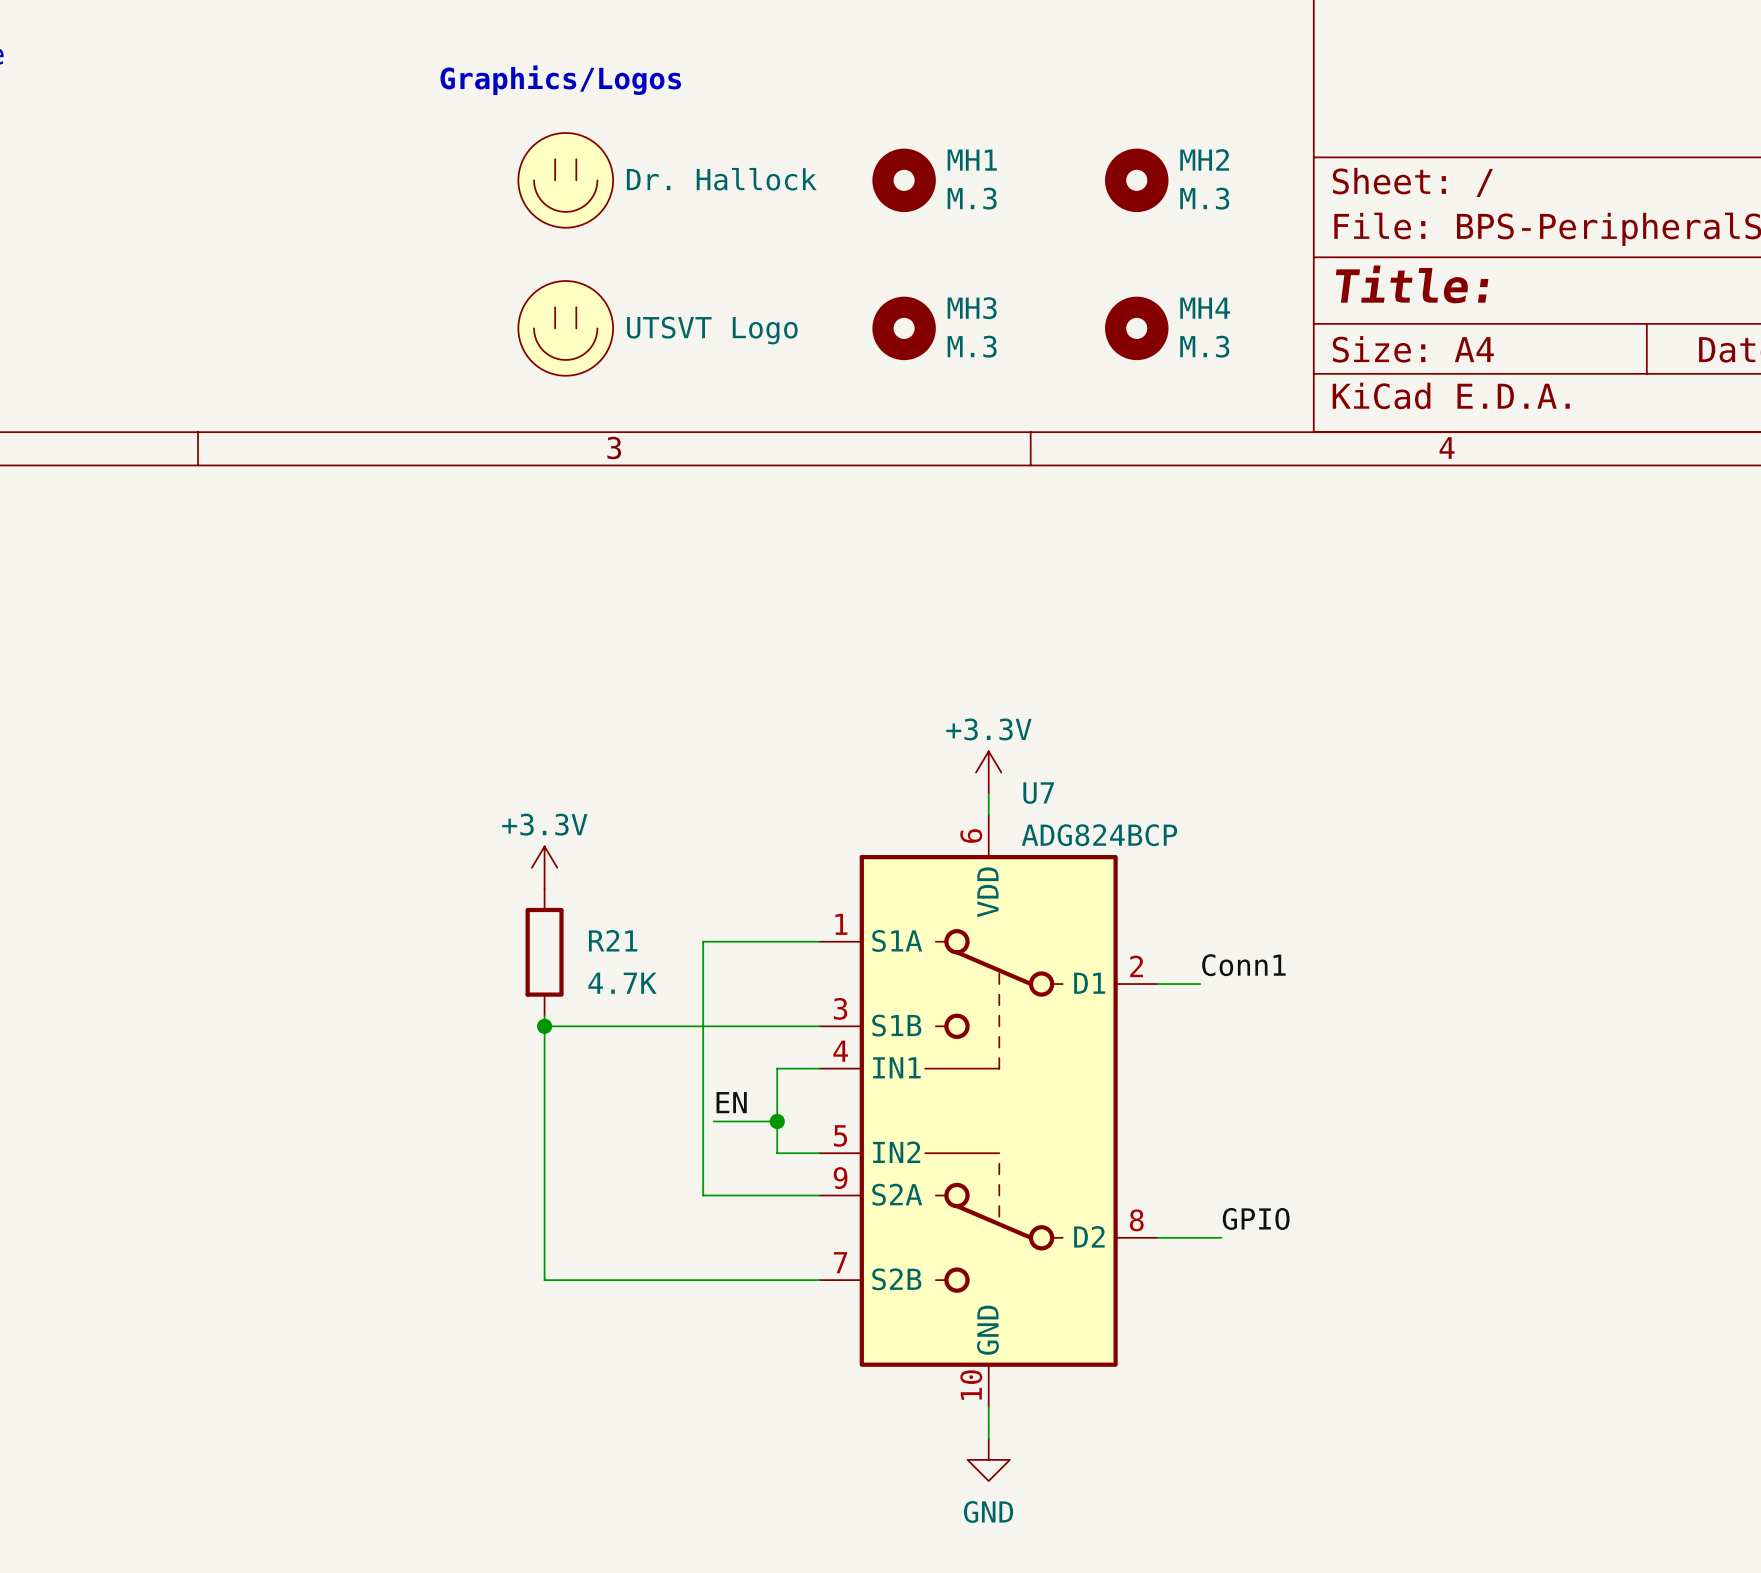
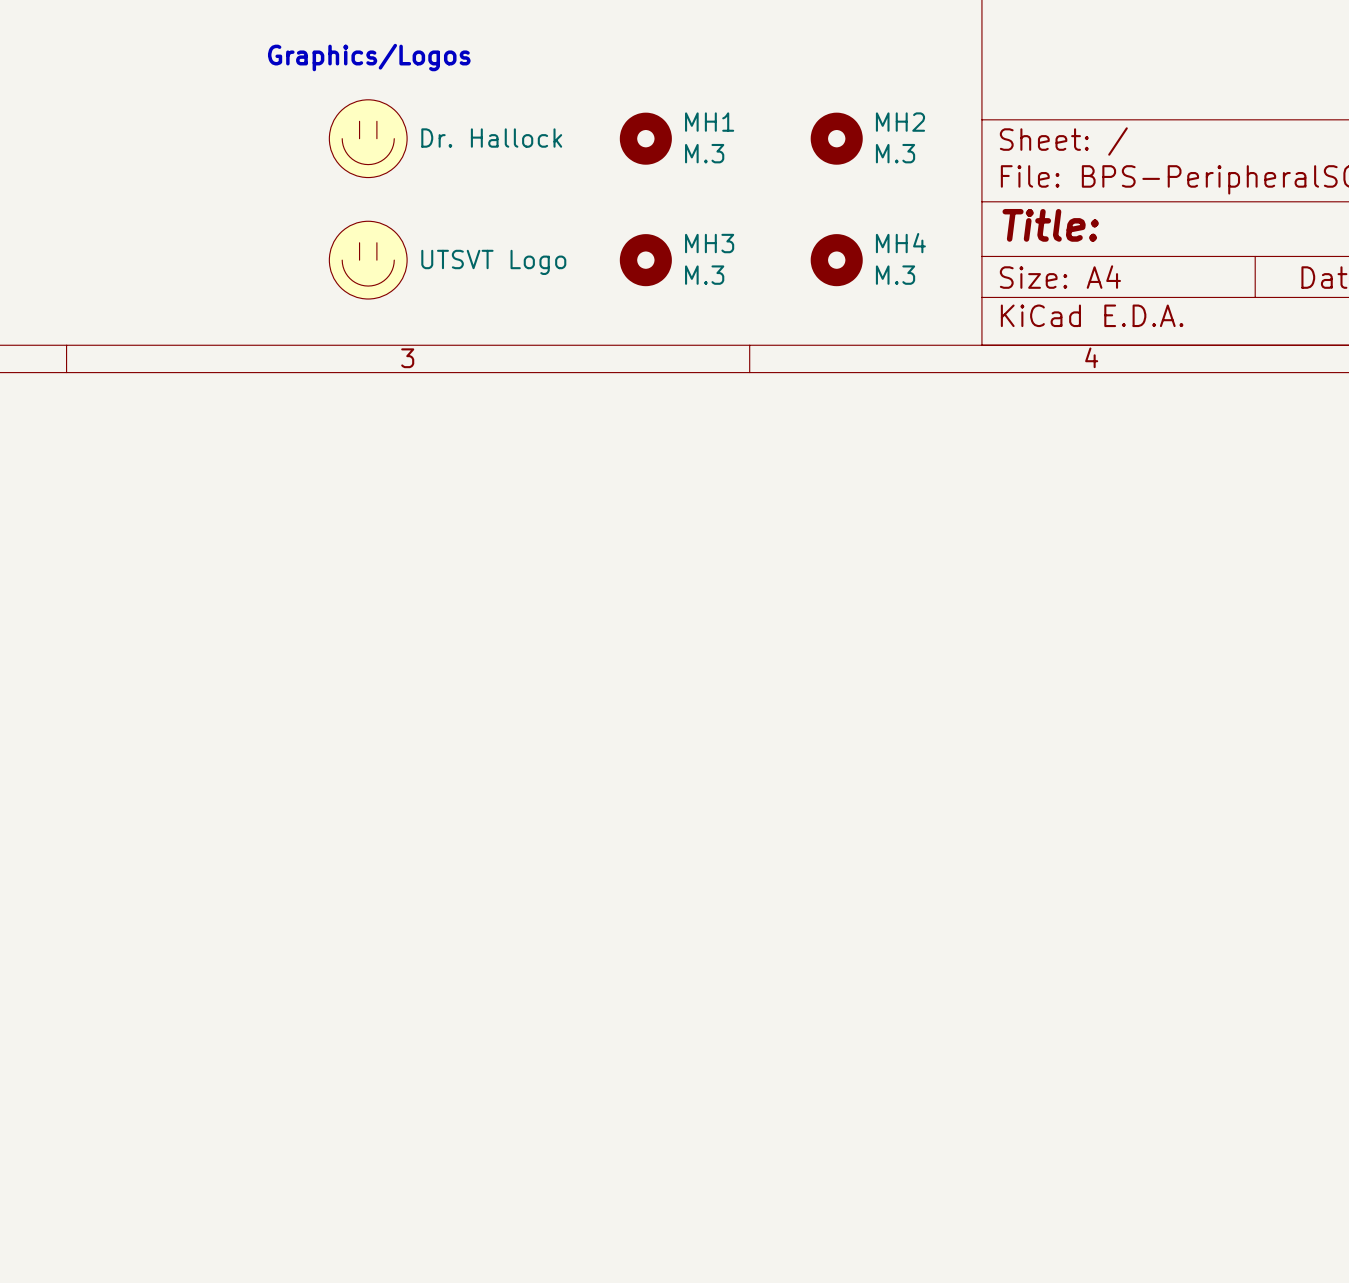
power symbol: +3.3V (988, 772) -> none
wire: (988, 793) (988, 814) -> none
power symbol: +3.3V (544, 867) -> none
wire: (819, 941) (703, 941) (703, 1195) (819, 1195) -> none
R21: 4.7K (544, 952) -> none
label: Conn1 (1243, 965) -> none
wire: (1157, 984) (1200, 984) -> none
wire: (544, 1015) (544, 1280) (819, 1280) -> none
wire: (544, 1026) (819, 1026) -> none
junction: (544, 1026) -> none
wire: (819, 1068) (777, 1068) (777, 1153) (819, 1153) -> none
label: EN (731, 1102) -> none
U7: ADG824BCP (988, 1110) -> none
wire: (713, 1121) (777, 1121) -> none
junction: (777, 1121) -> none
label: GPIO (1256, 1218) -> none
wire: (1157, 1237) (1221, 1237) -> none
wire: (988, 1407) (988, 1438) -> none
power symbol: GND (988, 1459) -> none

